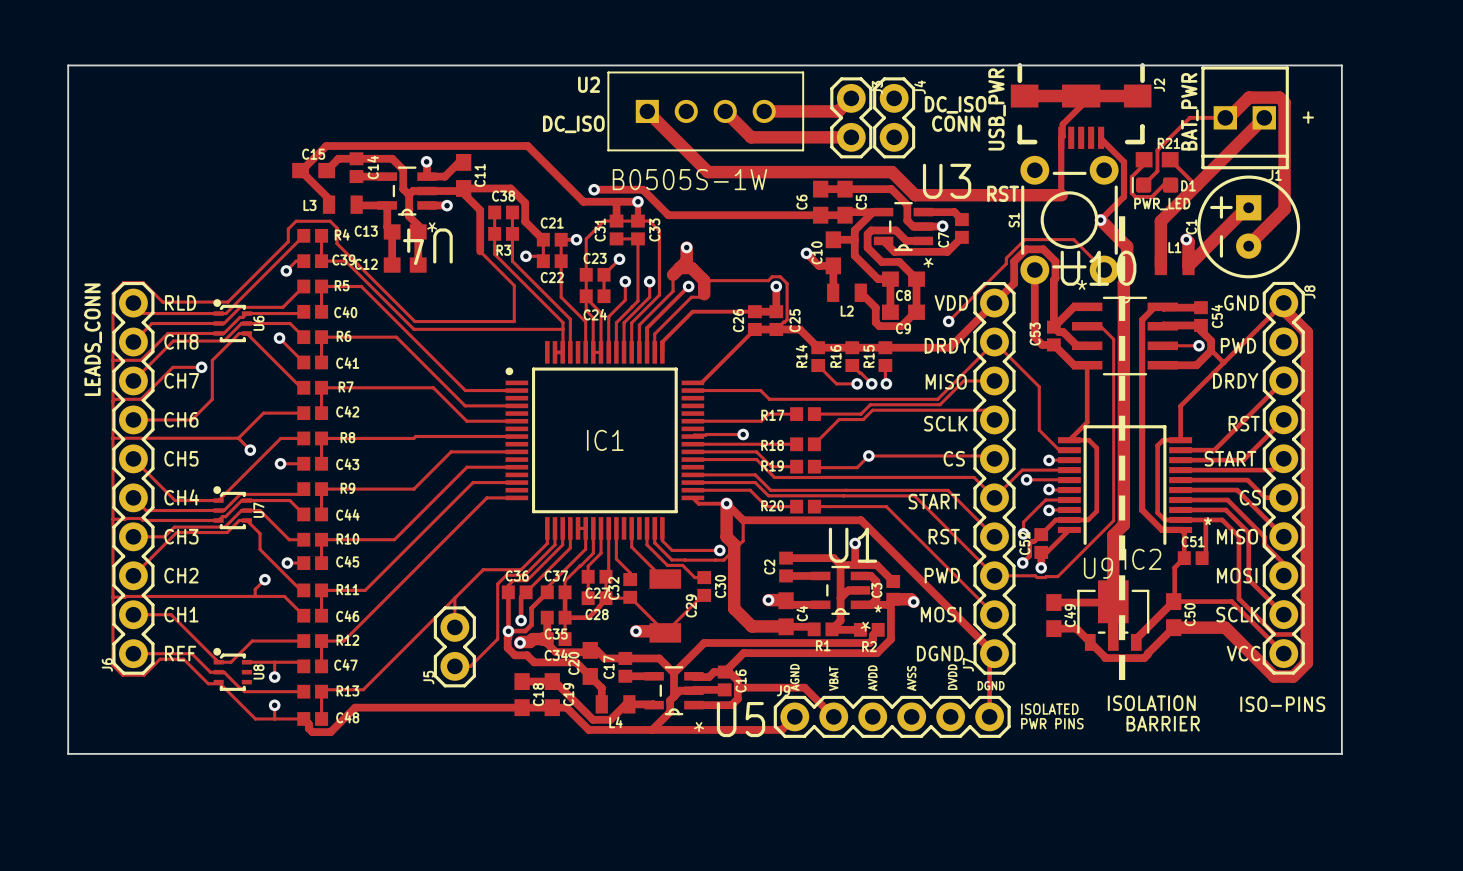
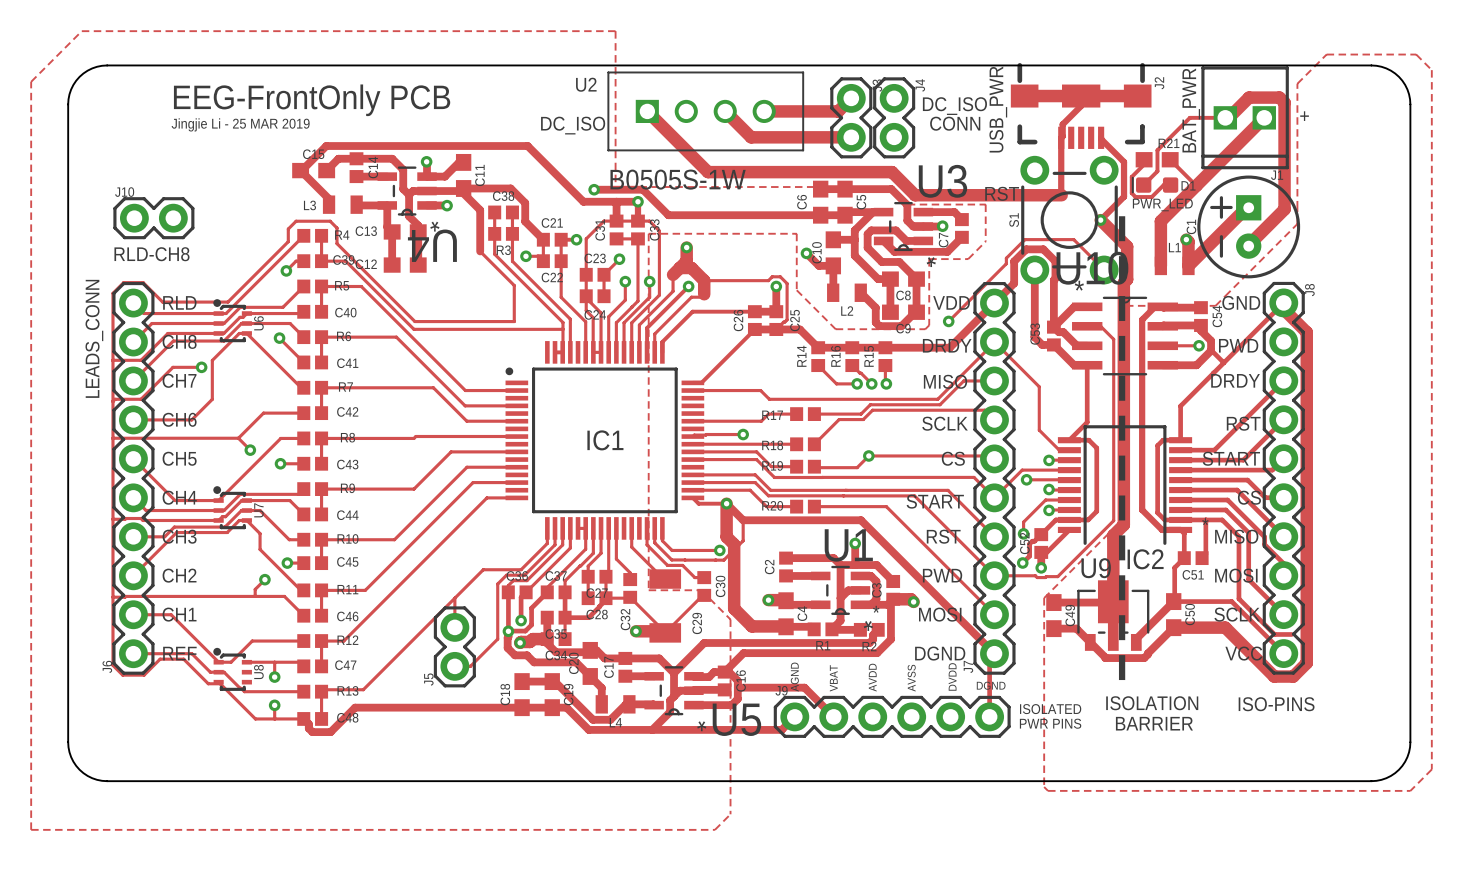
zone outline: none -> (81, 31) (615, 31) (615, 187) (890, 187) (907, 204) (985, 204) (985, 241) (968, 259) (929, 259) (929, 325) (925, 329) (835, 329) (796, 290) (796, 233) (648, 233) (648, 590) (701, 590) (730, 619) (730, 814) (714, 829) (31, 829) (31, 81) (81, 31)
zone outline: none -> (1326, 54) (1297, 83) (1297, 224) (1215, 305) (1125, 305) (1125, 518) (1044, 598) (1044, 787) (1048, 790) (1410, 790) (1431, 769) (1431, 70) (1416, 54) (1326, 54)
board edge: (107, 65) (68, 65) (68, 104) -> (107, 65) (92, 68) (79, 76) (71, 89) (68, 104)
board edge: (1341, 65) (1341, 753) (68, 753) (68, 742) -> (1341, 65) (1376, 65) (1390, 70) (1402, 80) (1410, 99) (1410, 742) (1405, 761) (1390, 775) (1371, 781) (107, 781) (92, 778) (79, 769) (71, 757) (68, 742)
text: none -> EEG-FrontOnly PCB (312, 100)
text: none -> Jingjie Li - 25 MAR 2019 (240, 124)
J10: none -> (153, 218)
text: none -> RLD-CH8 (151, 254)
C51 name position: C51 (1193, 541) -> C51 (1193, 574)
C32 name position: C32 (613, 588) -> C32 (625, 619)
C29 name position: C29 (691, 605) -> C29 (697, 623)
C18 name position: C18 (538, 694) -> C18 (505, 694)

